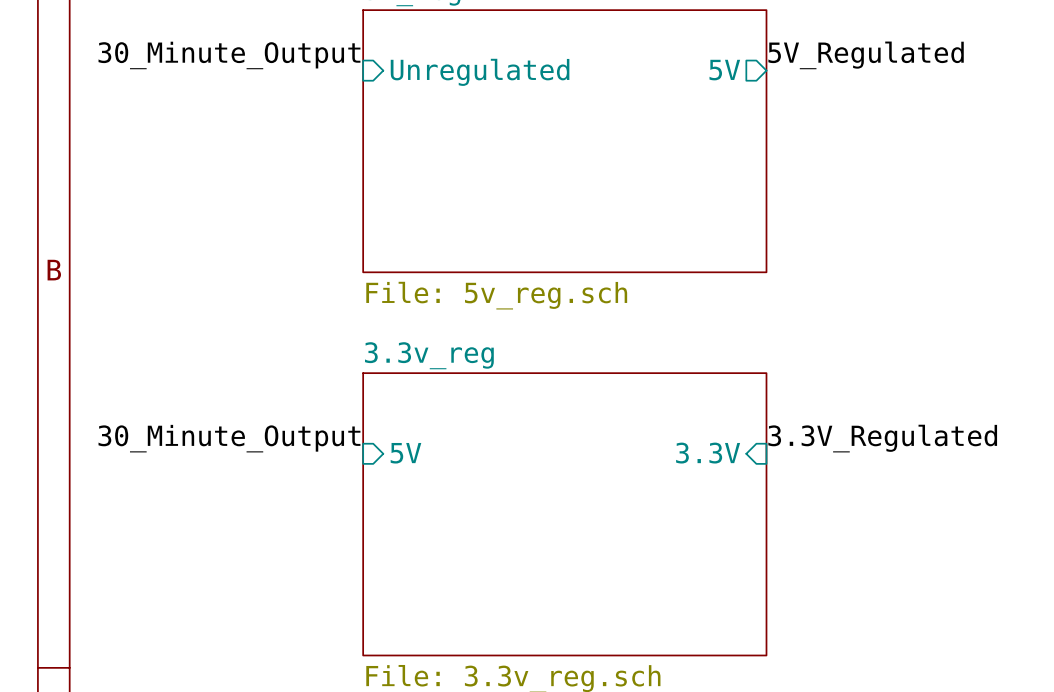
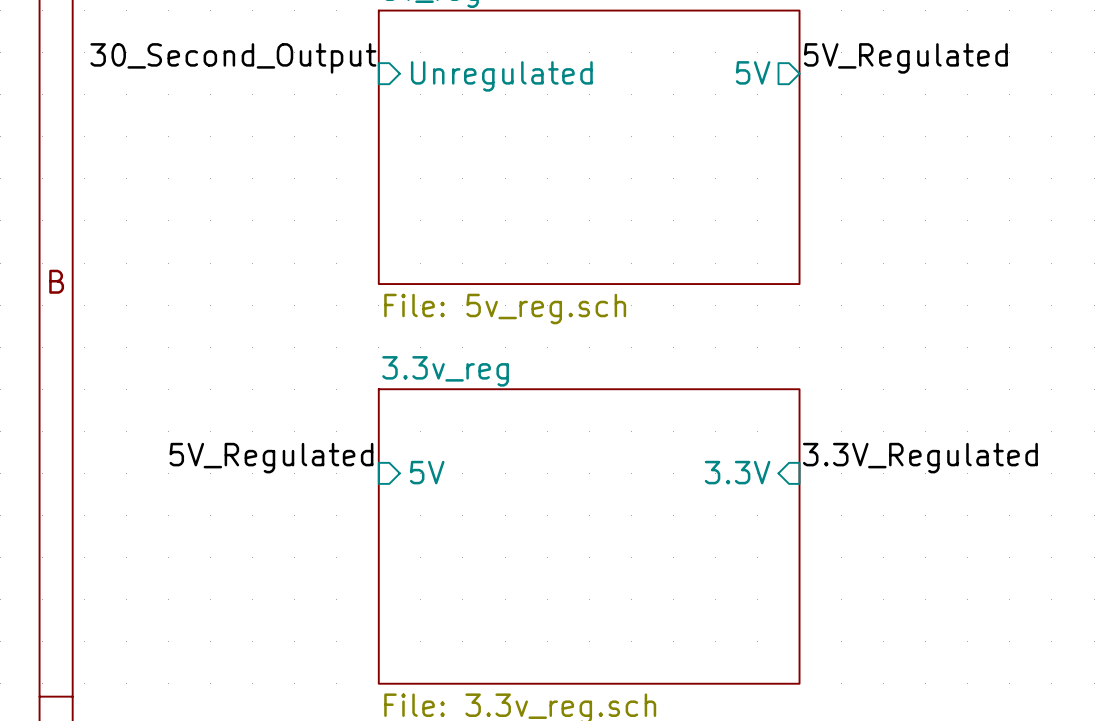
label: 30_Minute_Output (229, 55) -> 30_Second_Output (233, 58)
label: 30_Minute_Output (229, 438) -> 5V_Regulated (271, 458)

